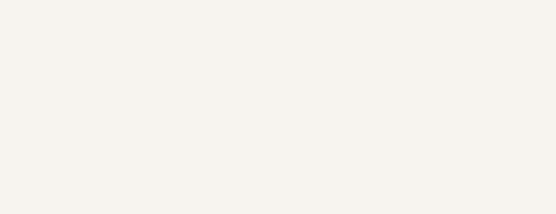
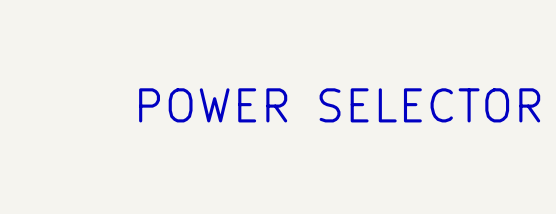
text: none -> POWER SELECTOR (339, 105)

